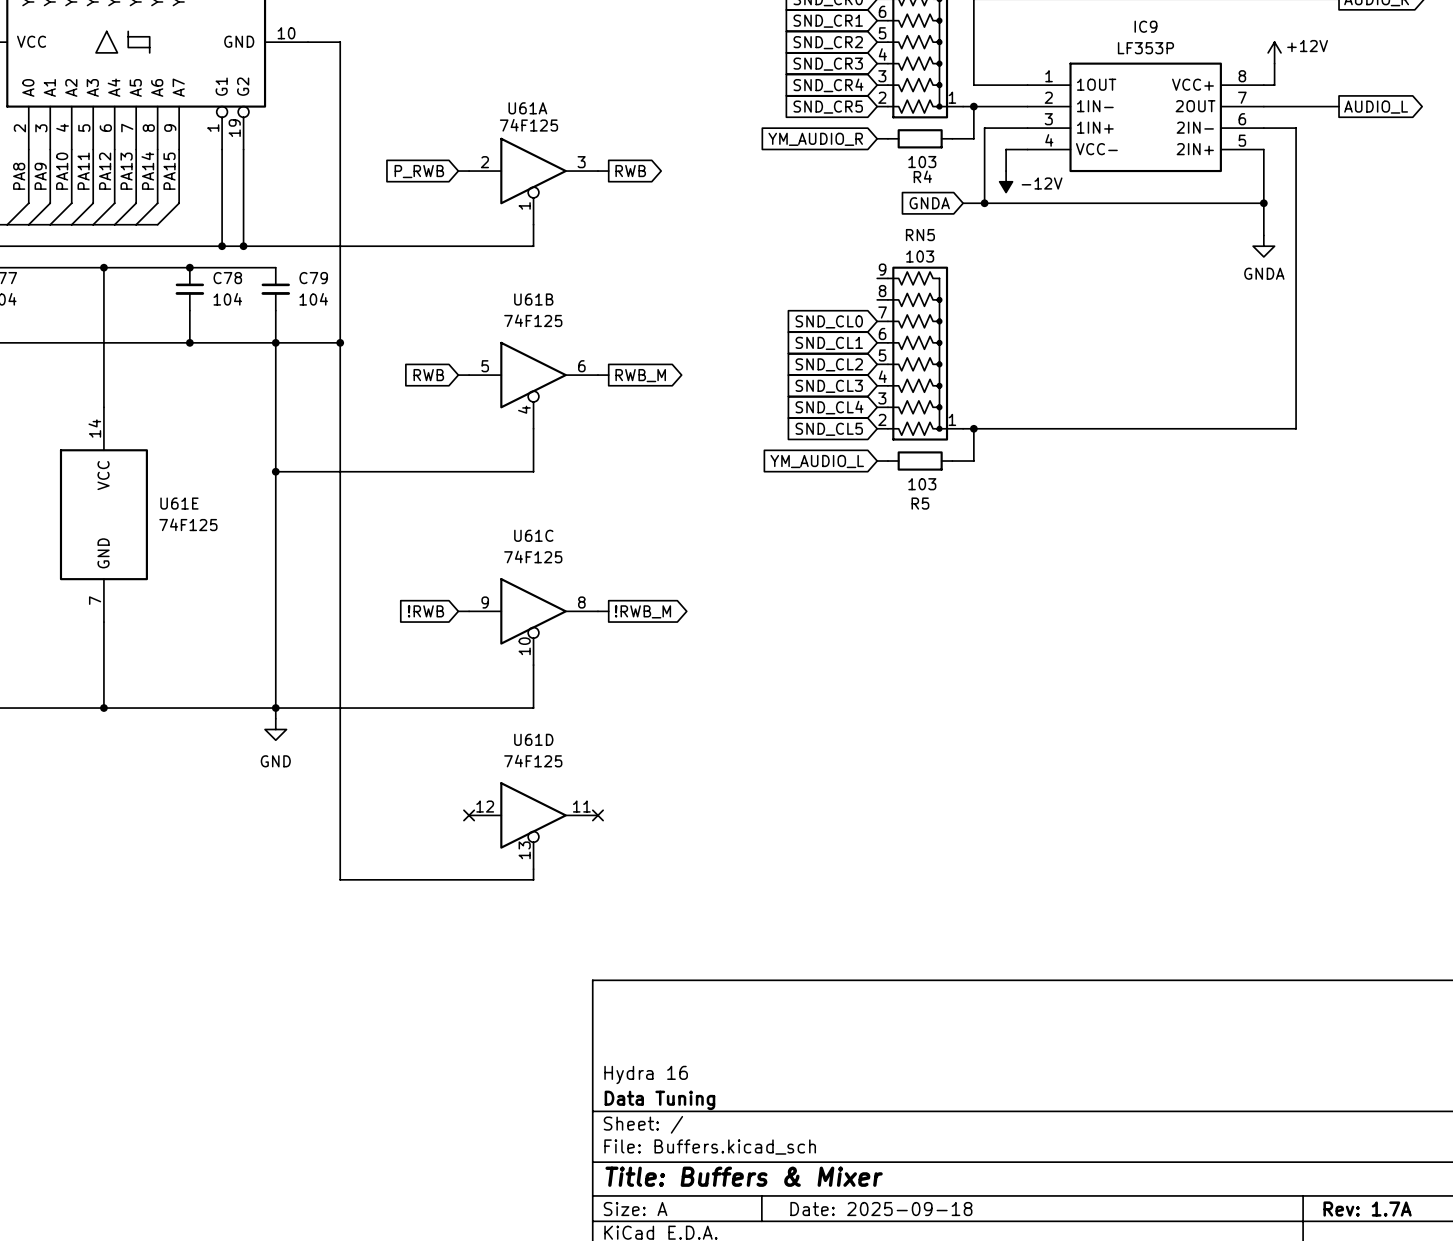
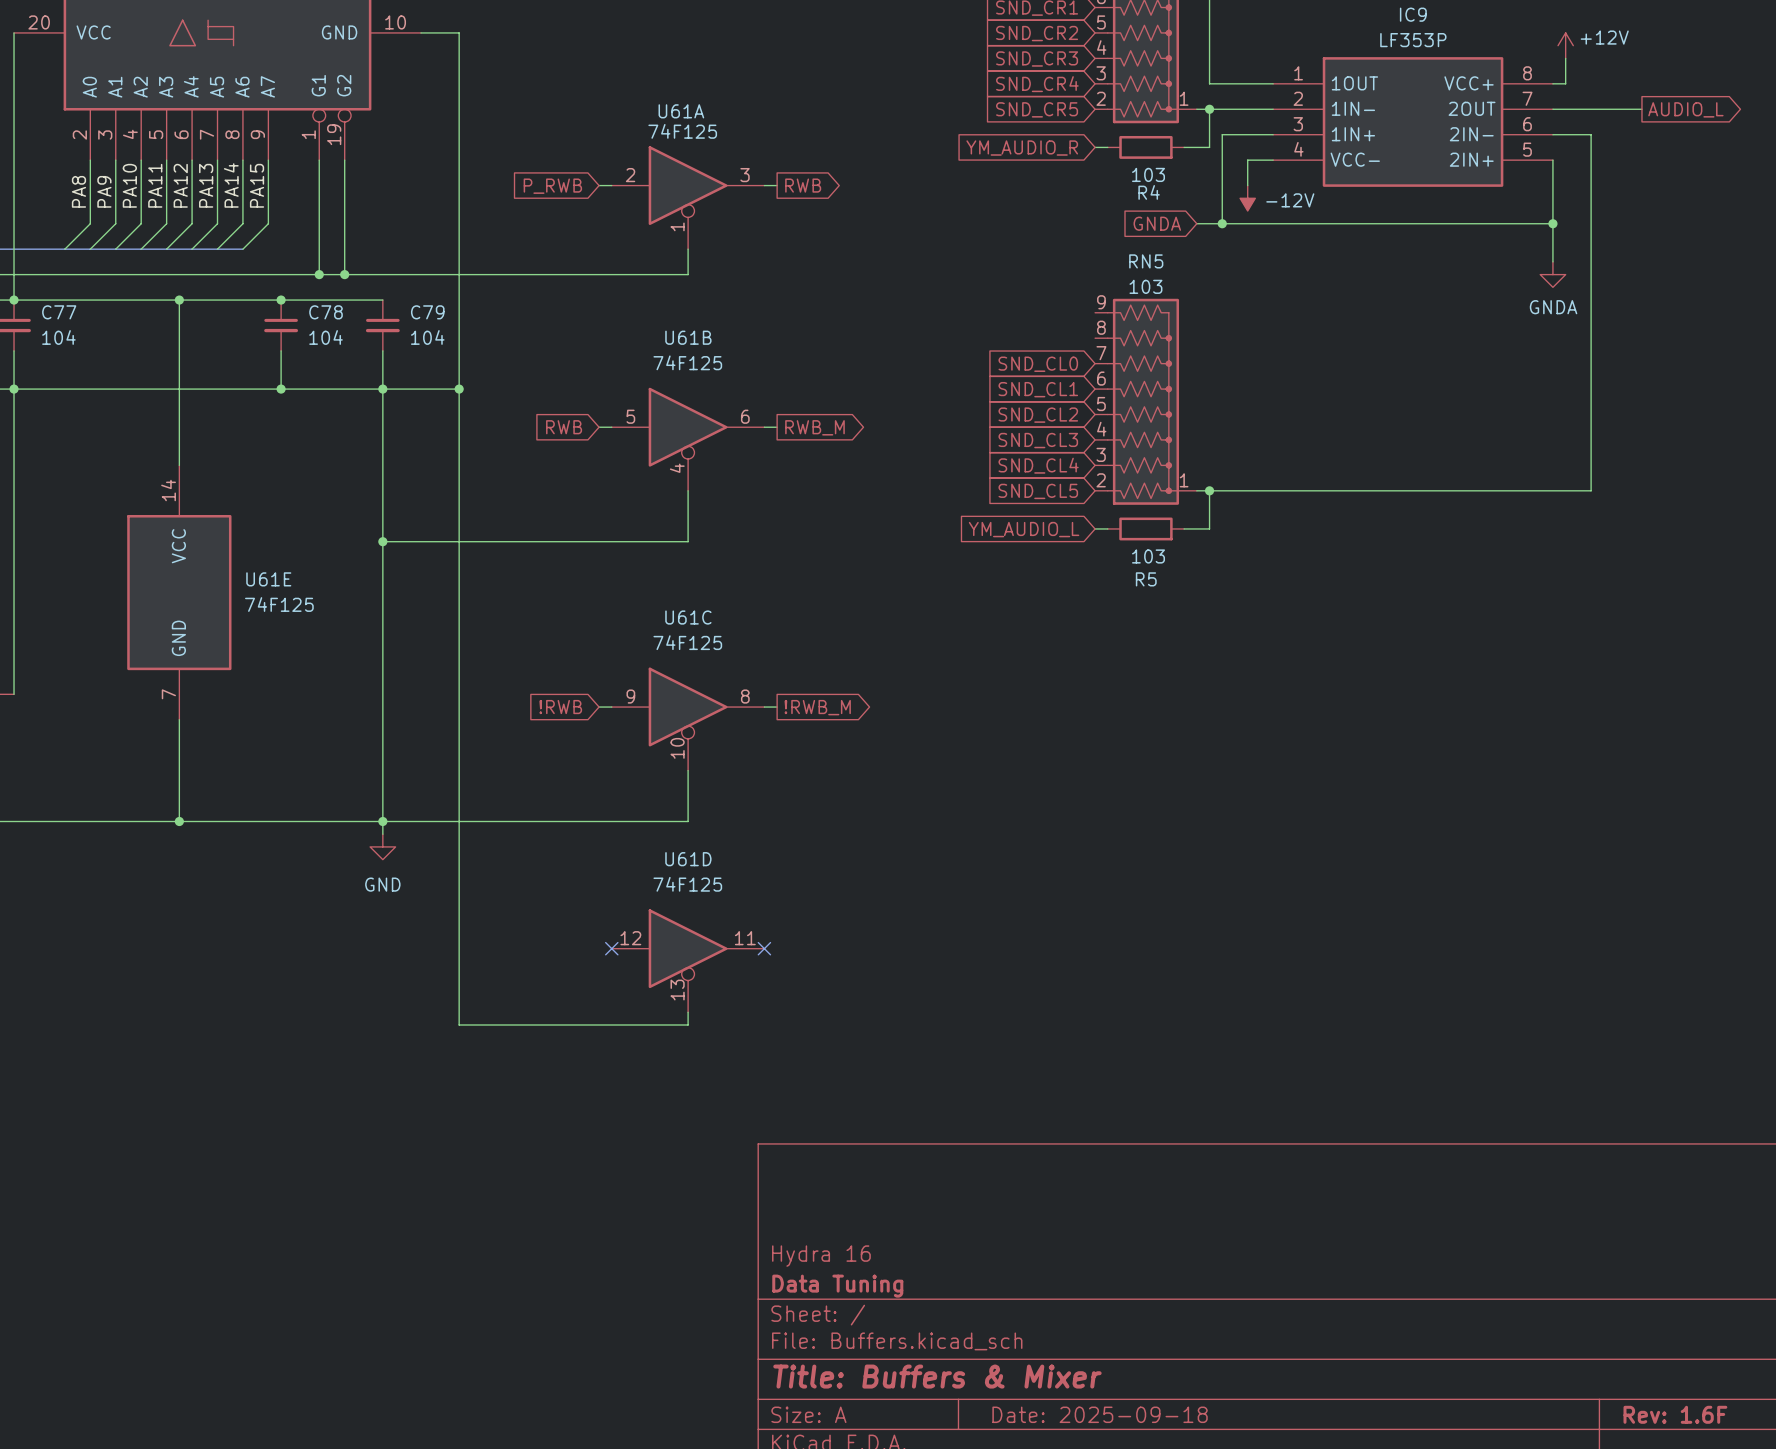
title block: Rev: 1.7A (1367, 1209) -> Rev: 1.6F (1675, 1414)

